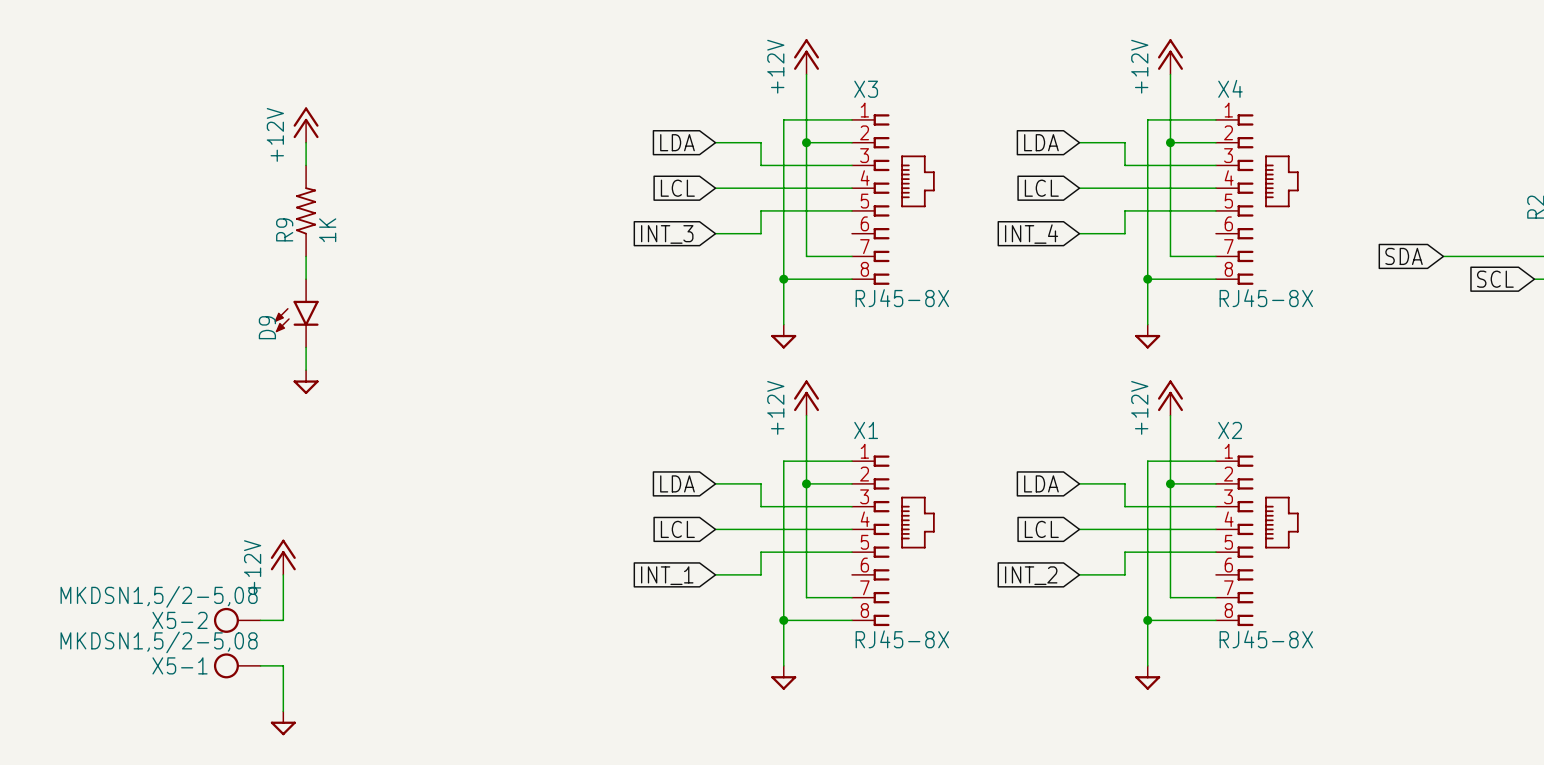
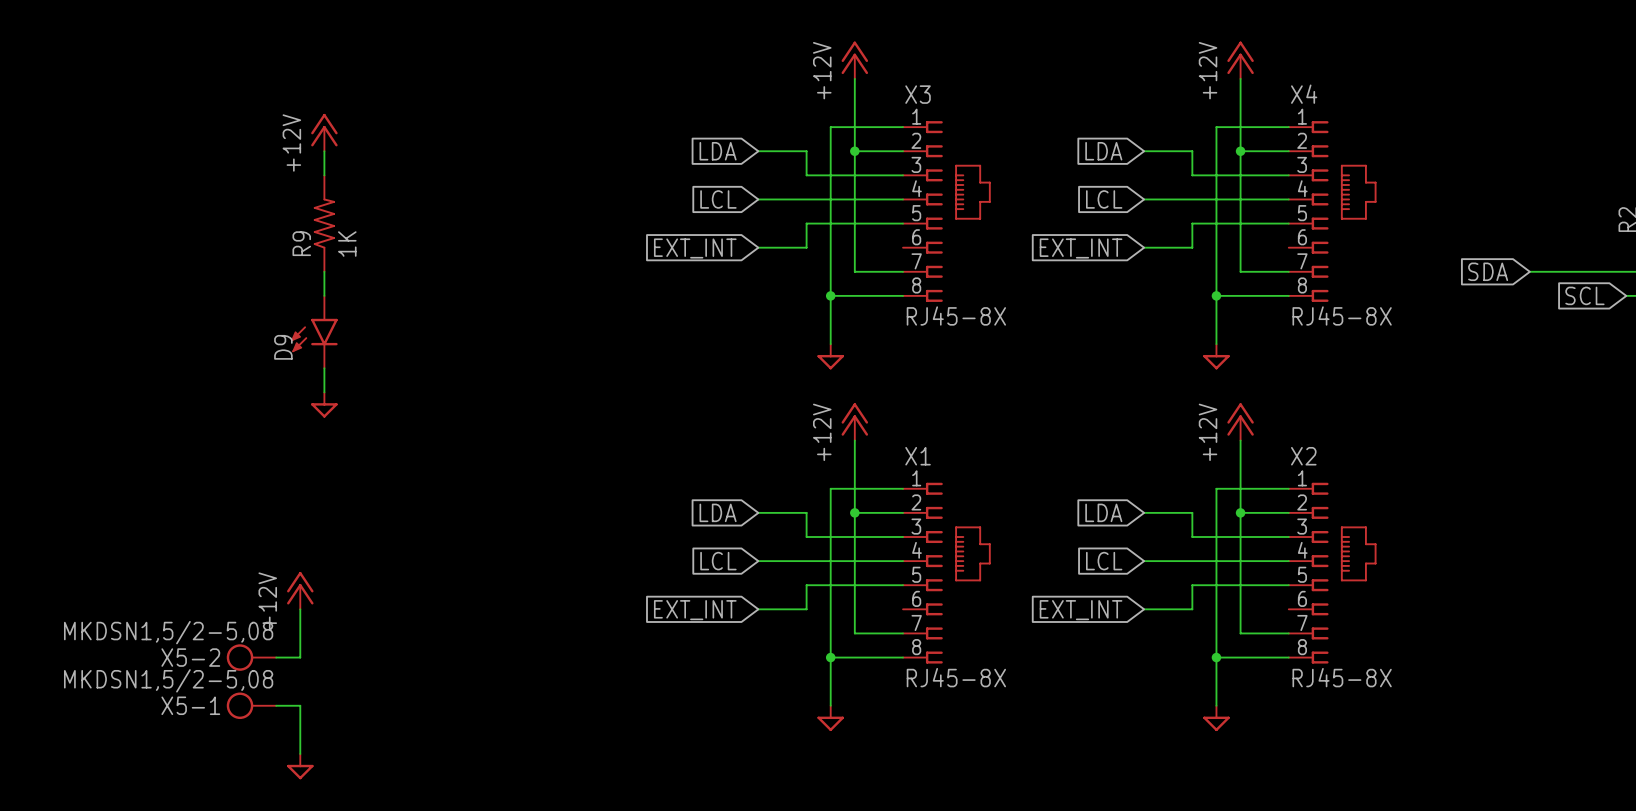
global label: INT_3 (667, 234) -> EXT_INT (695, 248)
global label: INT_4 (1031, 234) -> EXT_INT (1081, 248)
global label: INT_1 (667, 575) -> EXT_INT (695, 610)
global label: INT_2 (1031, 575) -> EXT_INT (1081, 610)

